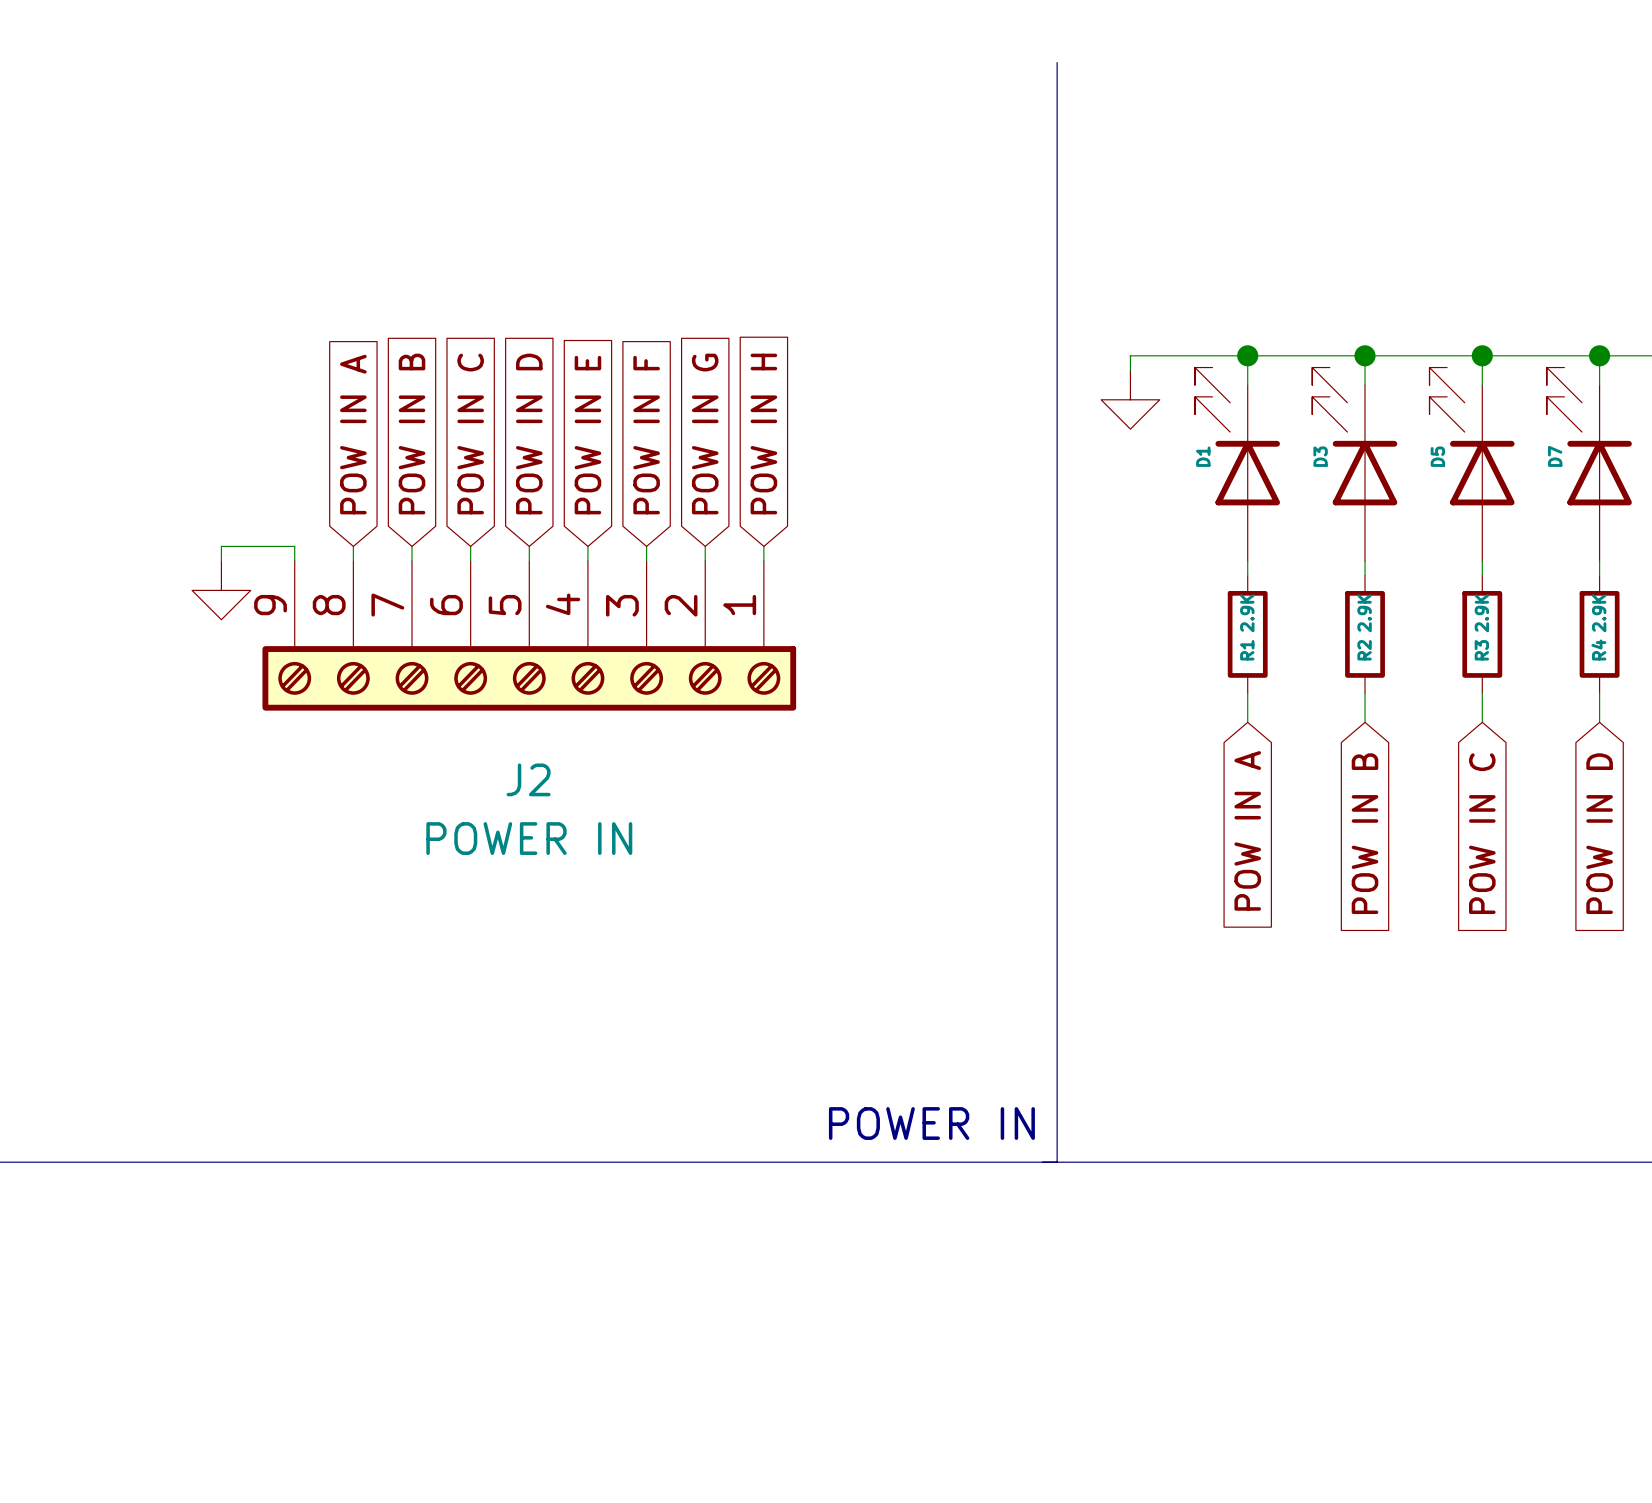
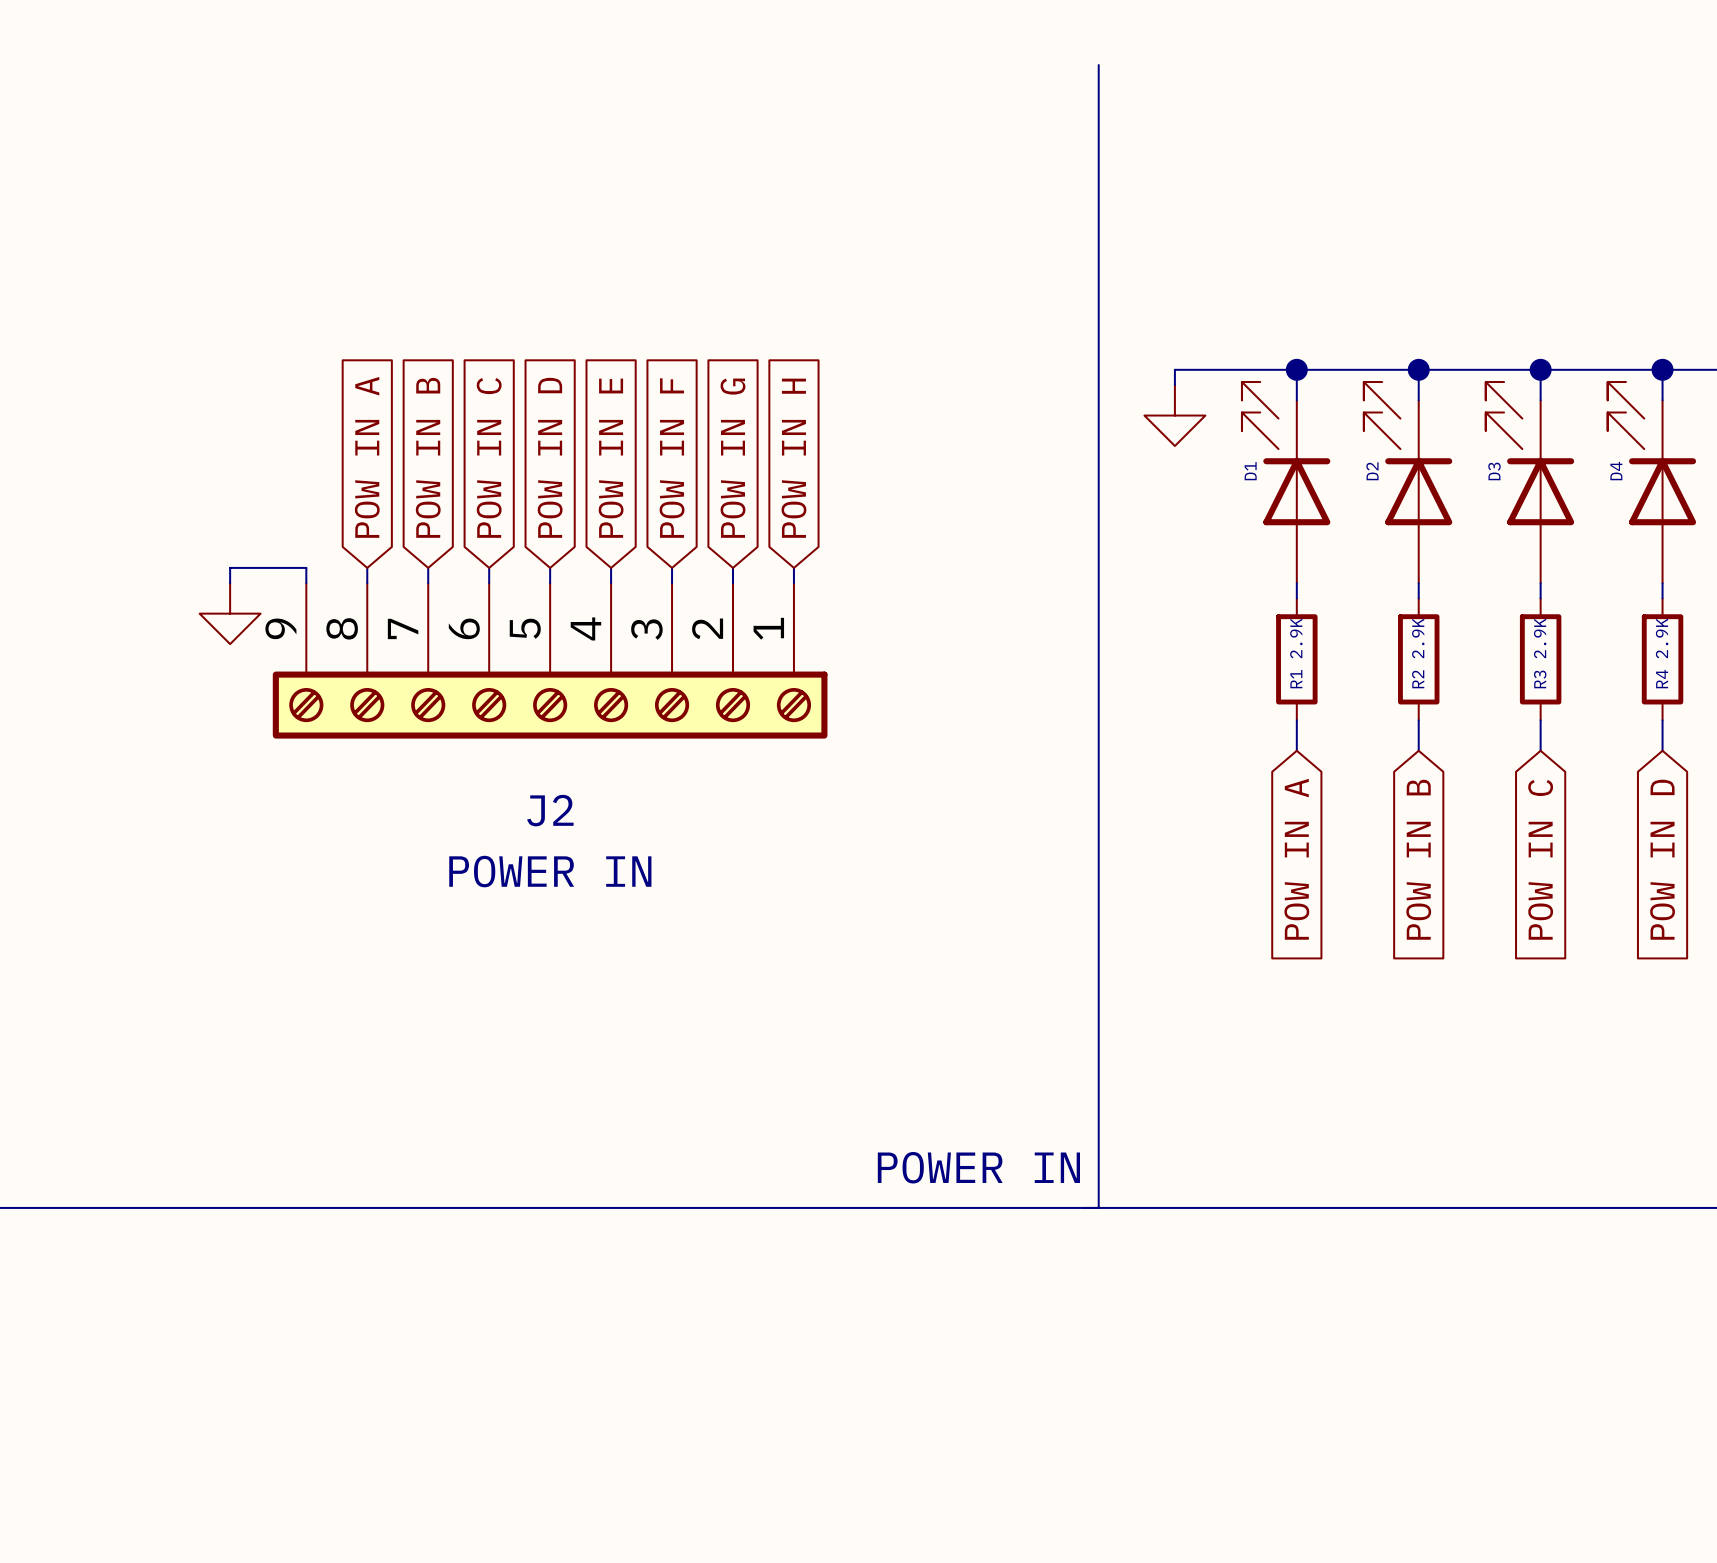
D3 name: D3 (1320, 456) -> D2 (1372, 471)
D5 name: D5 (1437, 456) -> D3 (1494, 471)
D7 name: D7 (1555, 456) -> D4 (1616, 471)

